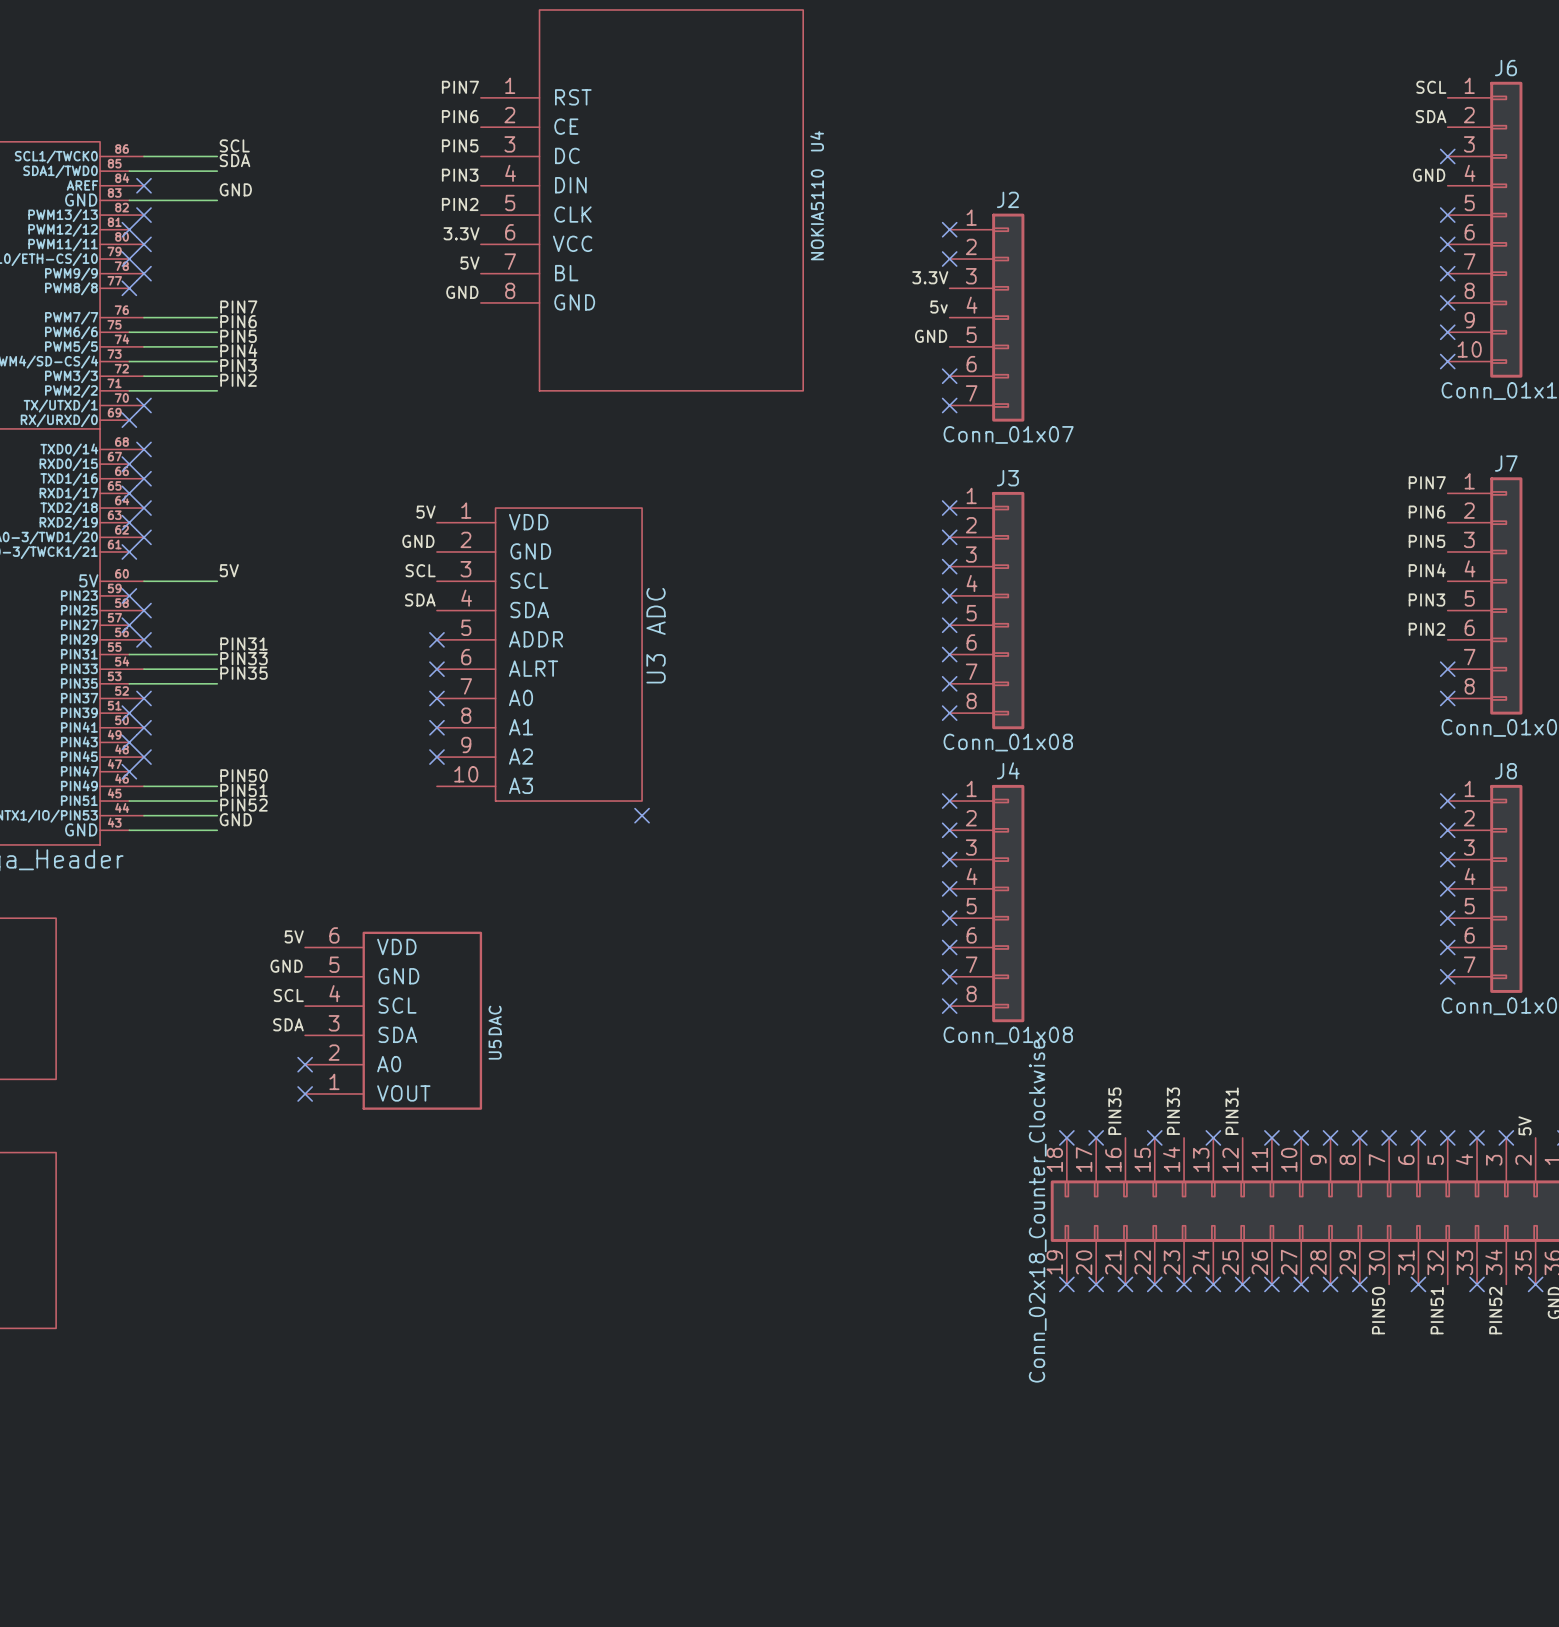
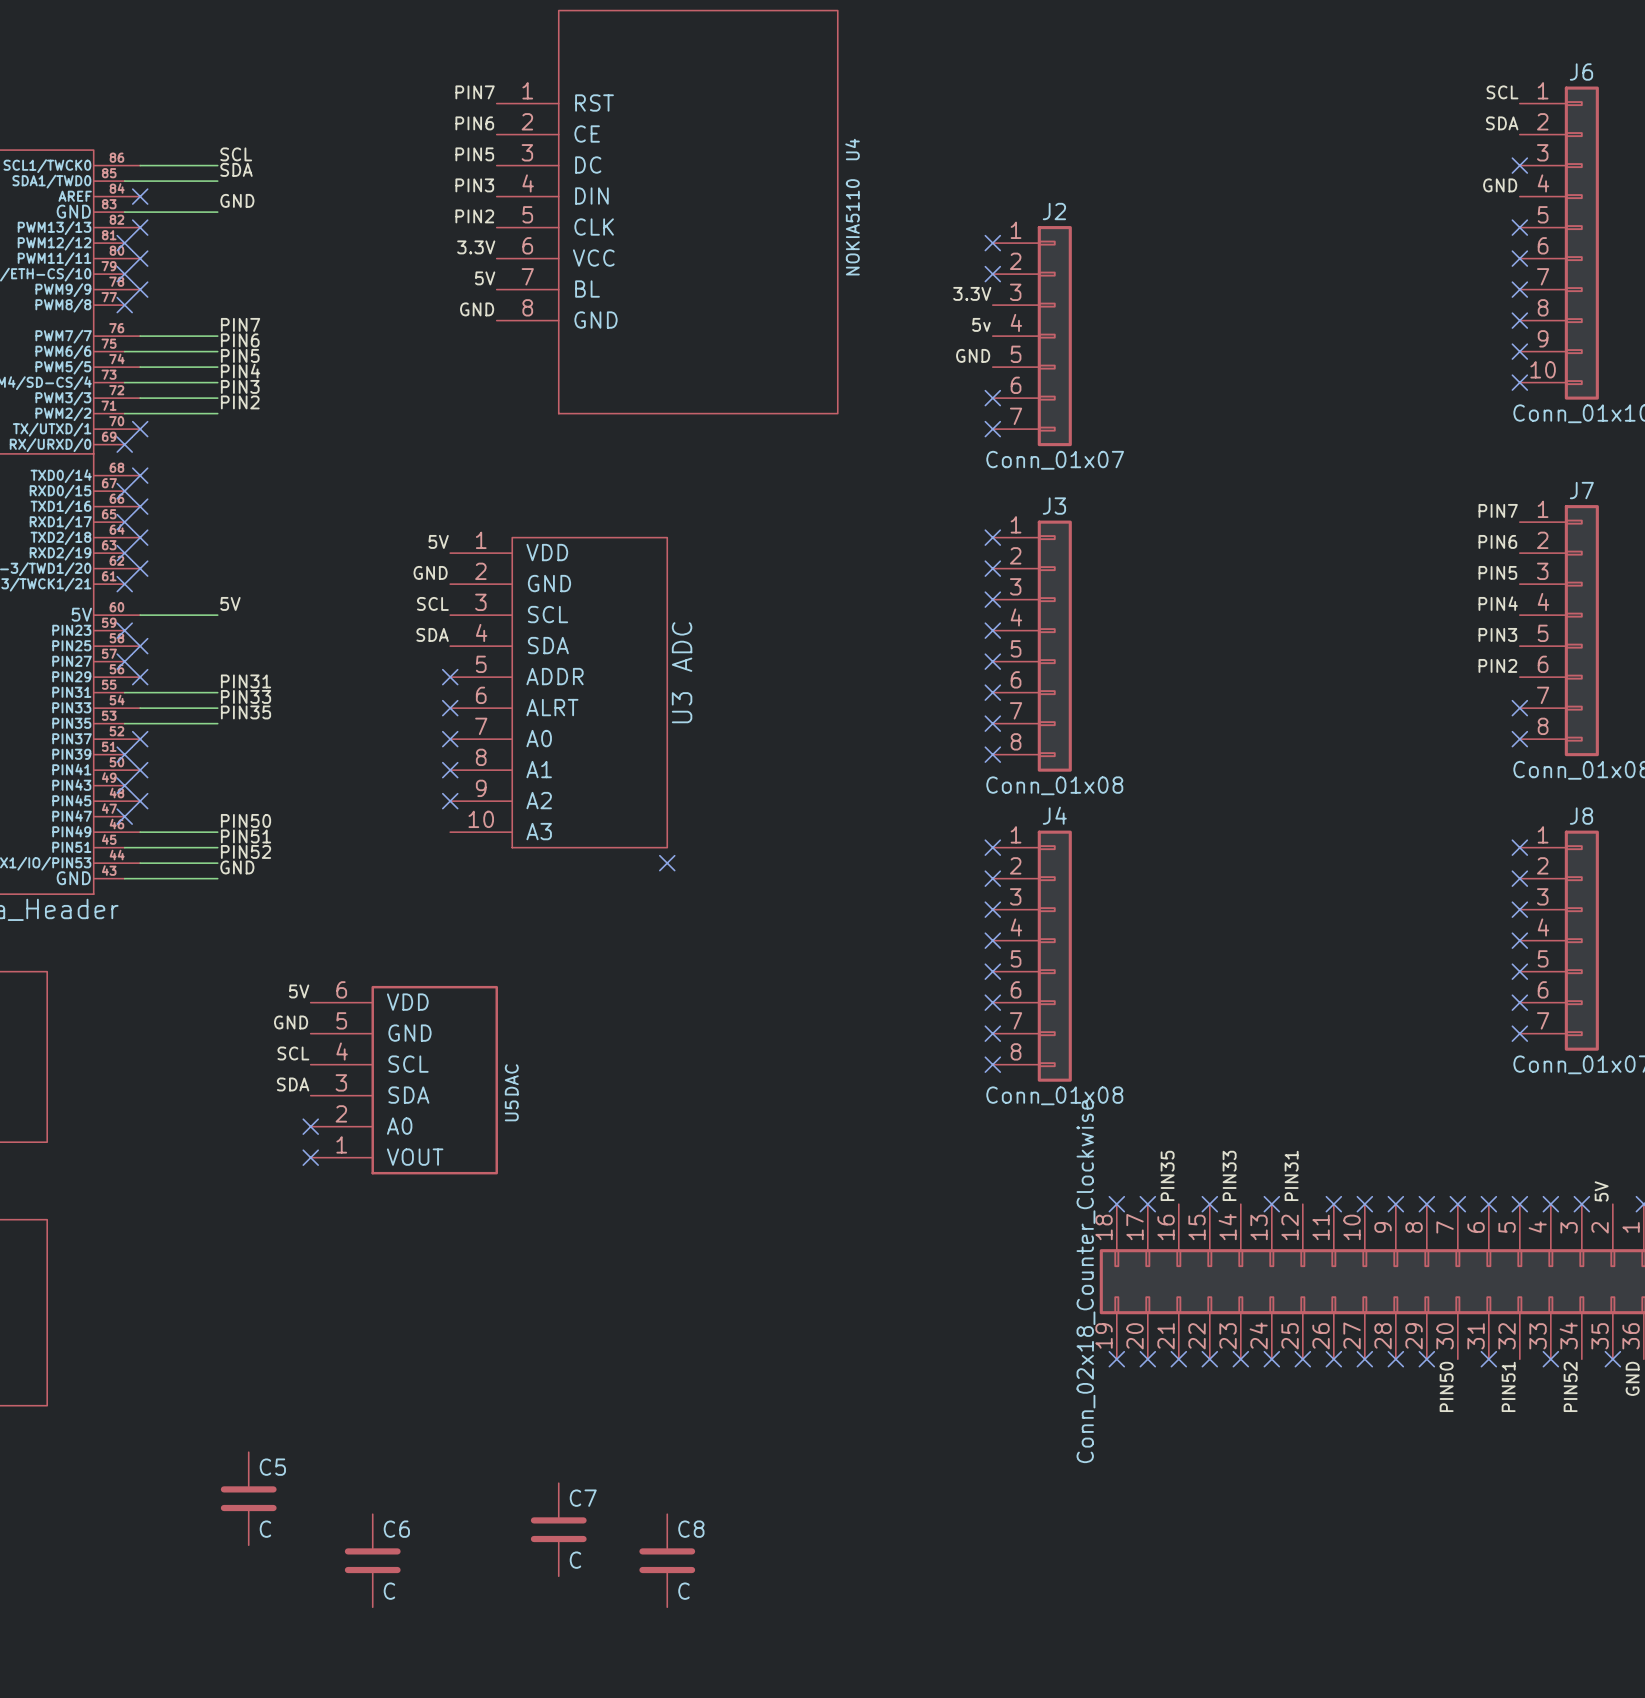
C5: none -> C (248, 1498)
C7: none -> C (558, 1529)
C6: none -> C (372, 1560)
C8: none -> C (667, 1560)

